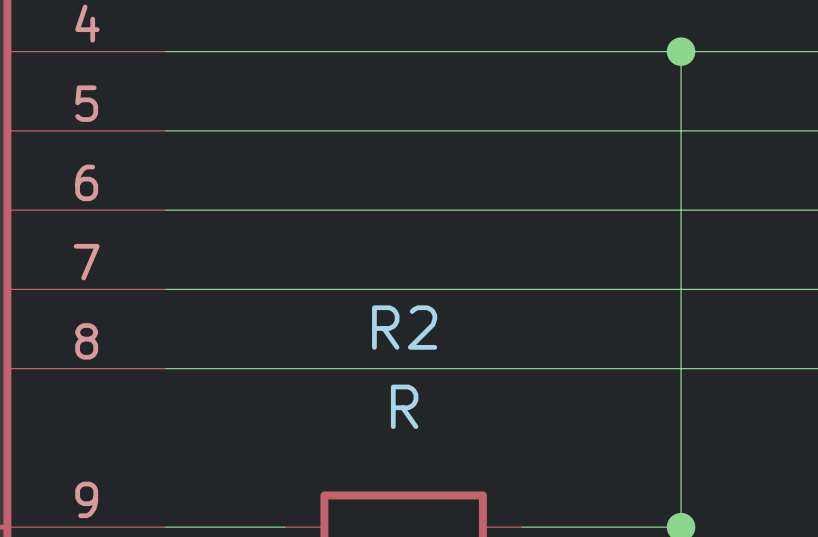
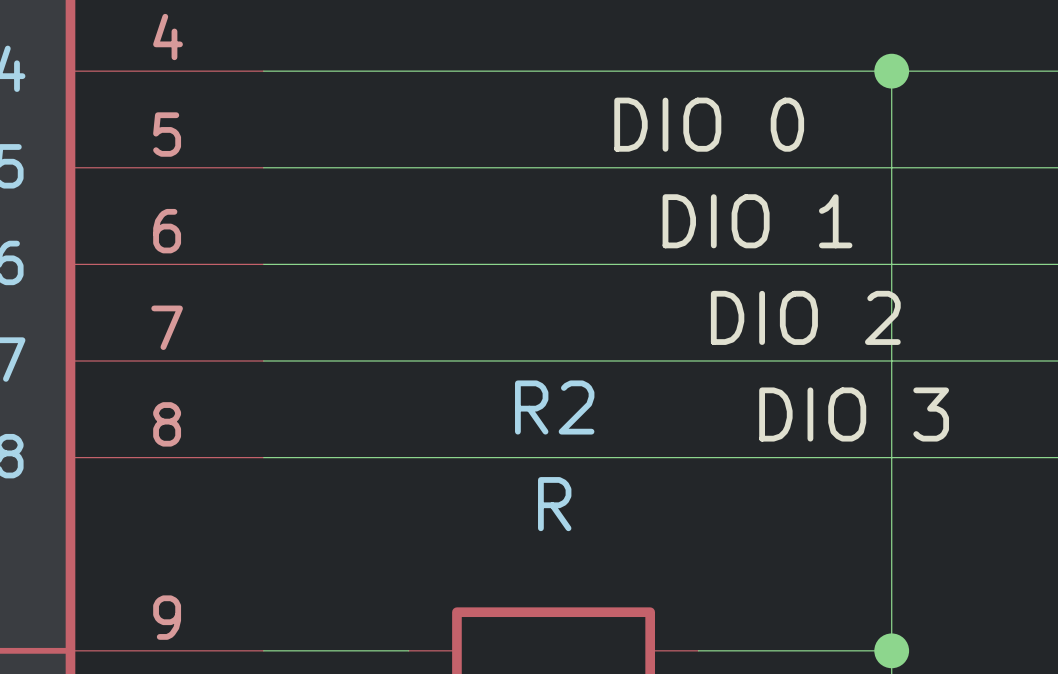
label: none -> DIO 0 (709, 124)
label: none -> DIO 1 (757, 221)
label: none -> DIO 2 (805, 317)
label: none -> DIO 3 (854, 414)

